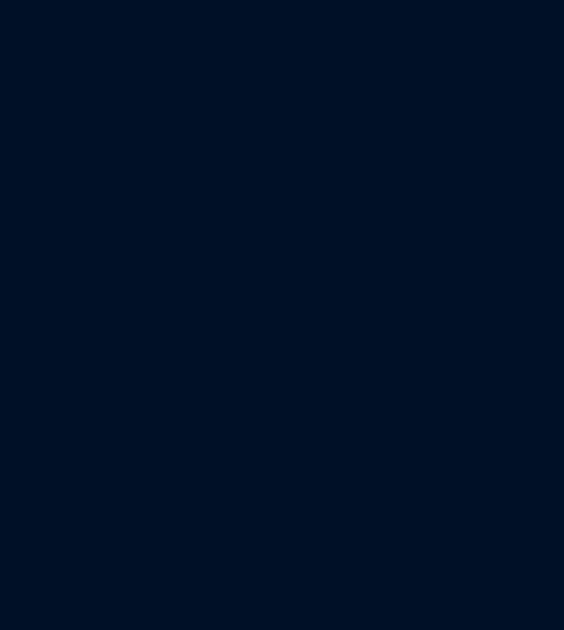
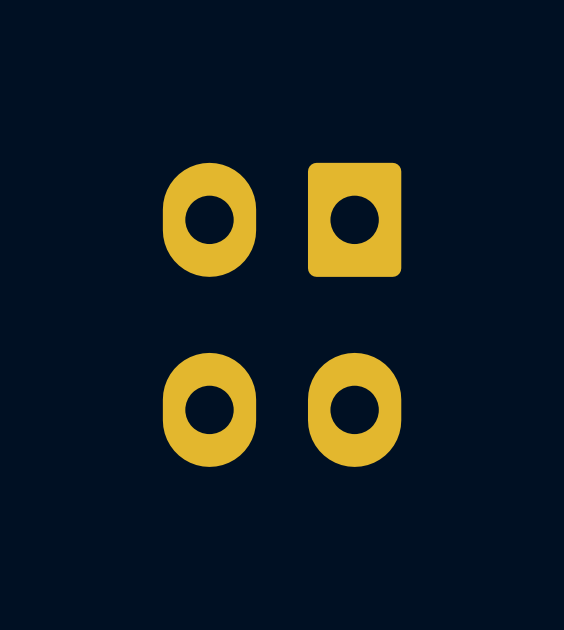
part: none -> (282, 314)

